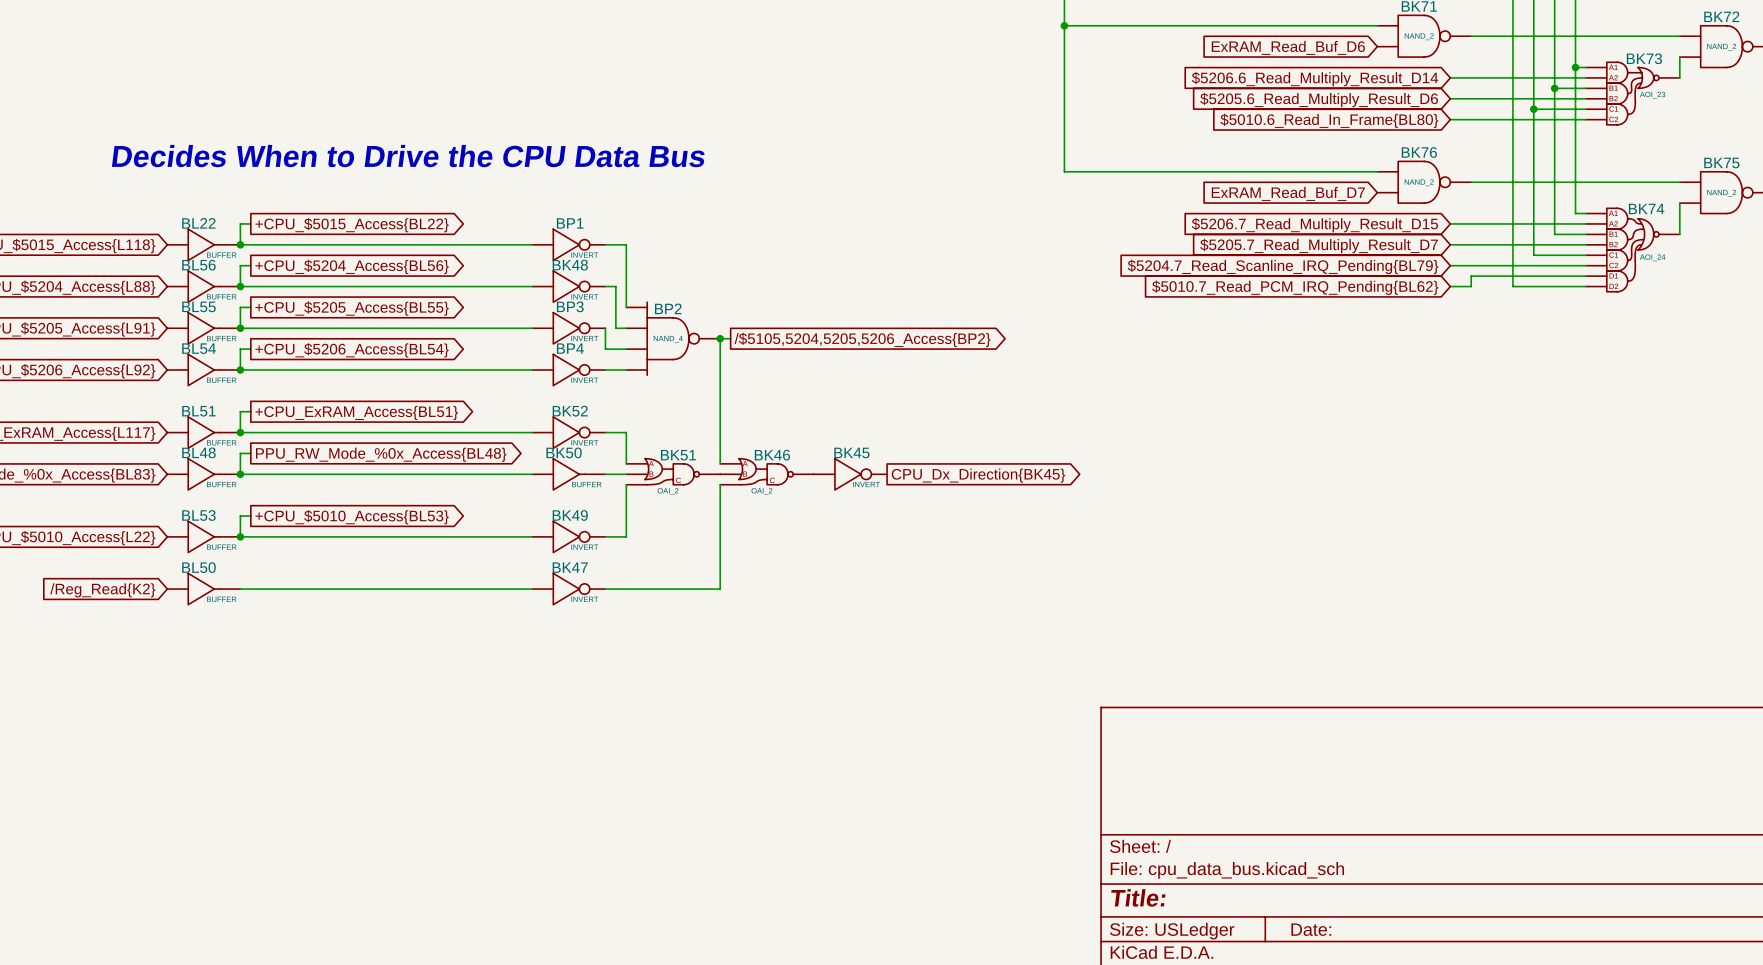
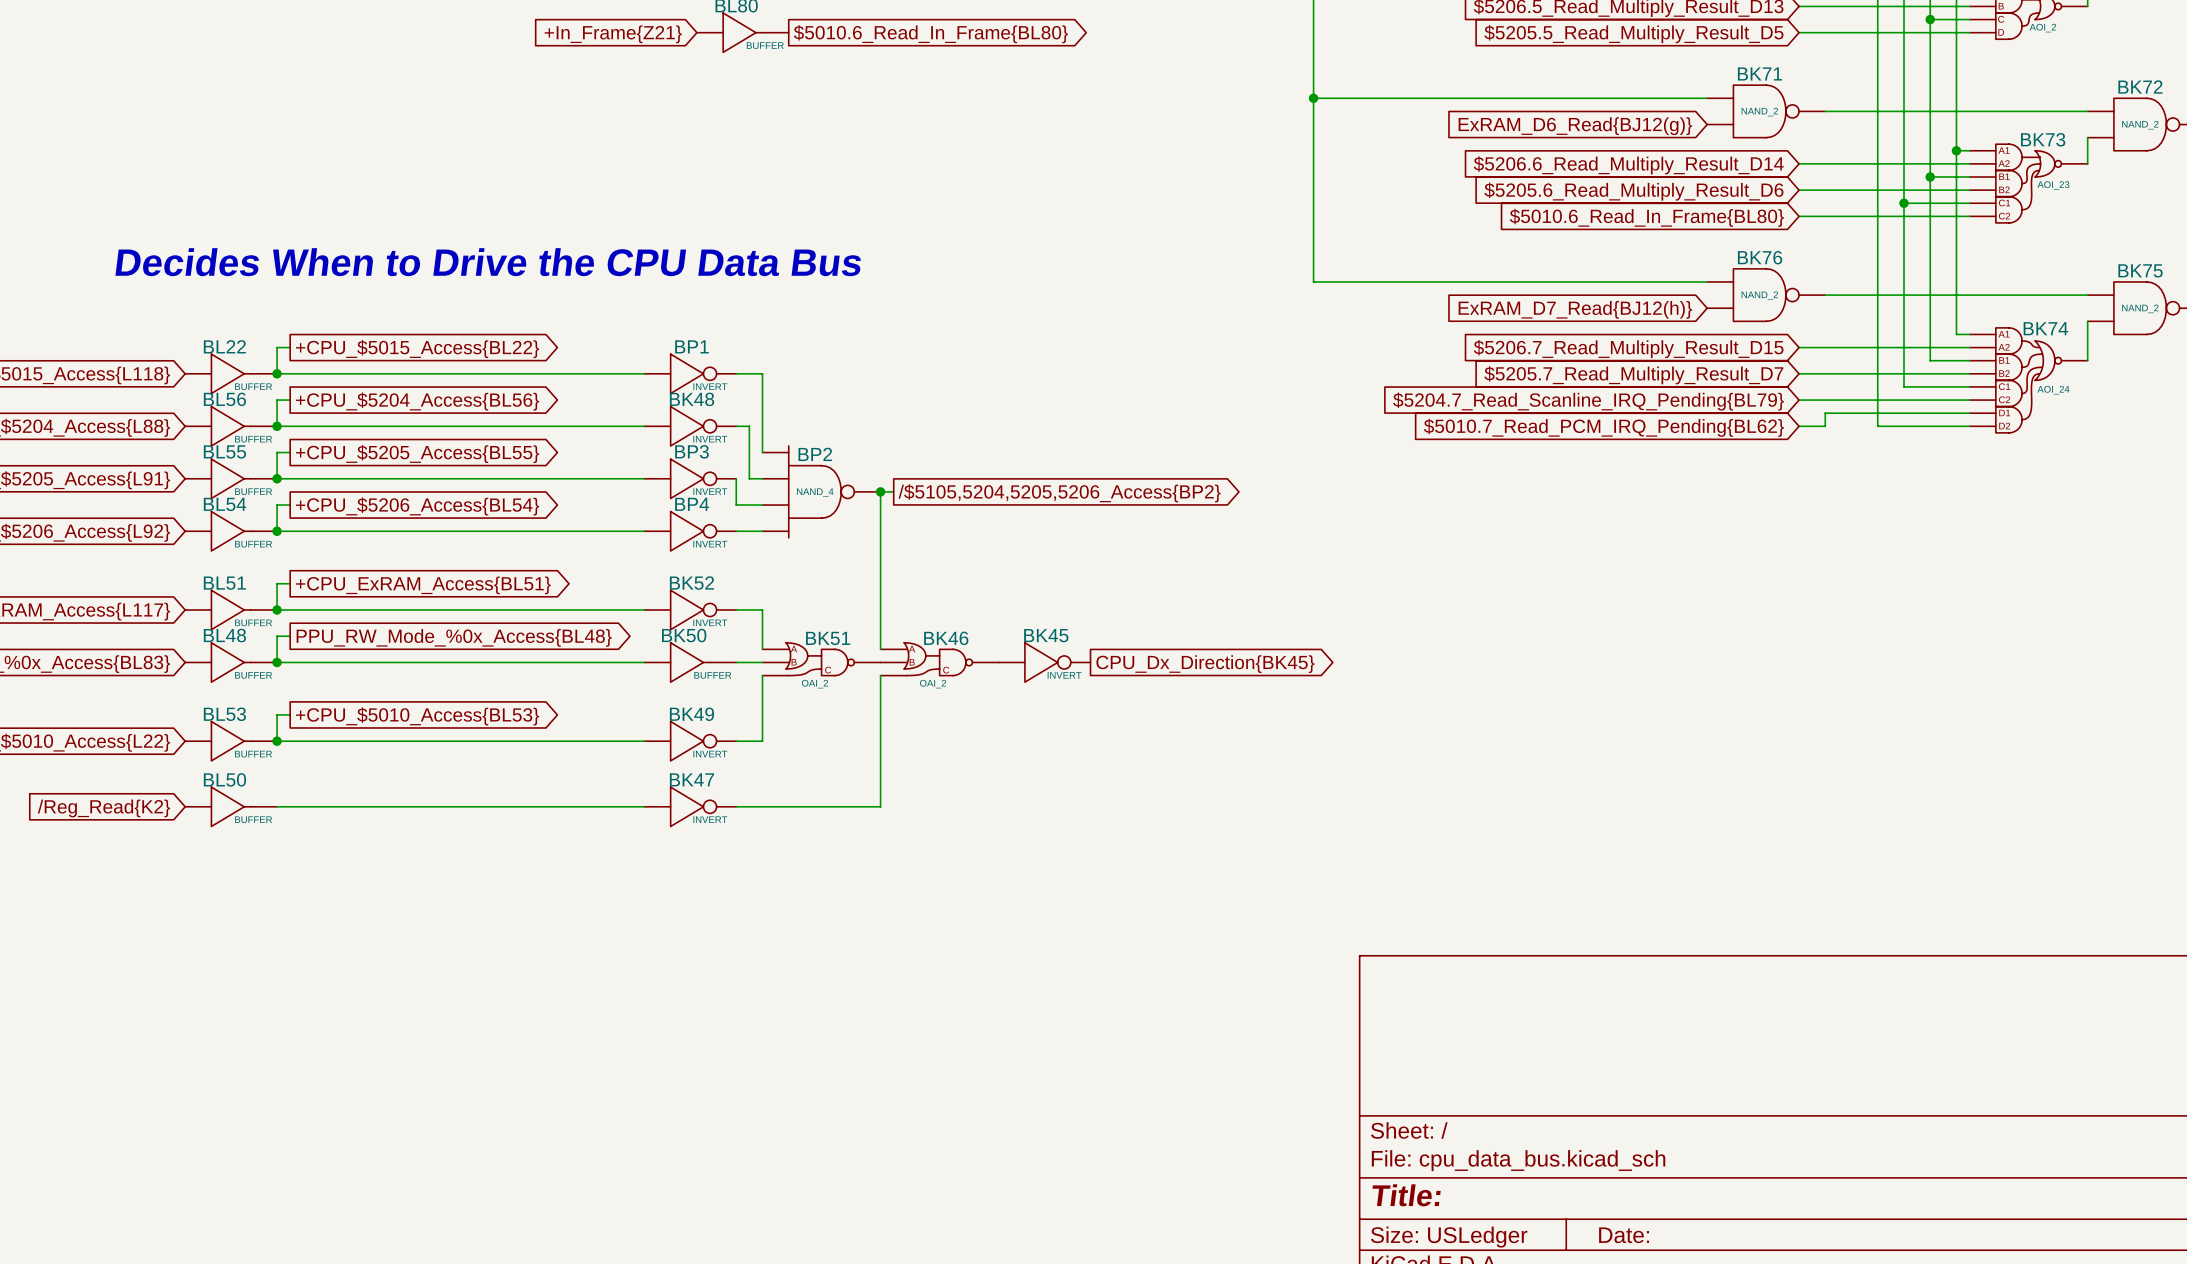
global label: ExRAM_Read_Buf_D6 (1288, 47) -> ExRAM_D6_Read{BJ12(g)} (1575, 126)
global label: ExRAM_Read_Buf_D7 (1288, 193) -> ExRAM_D7_Read{BJ12(h)} (1575, 309)

